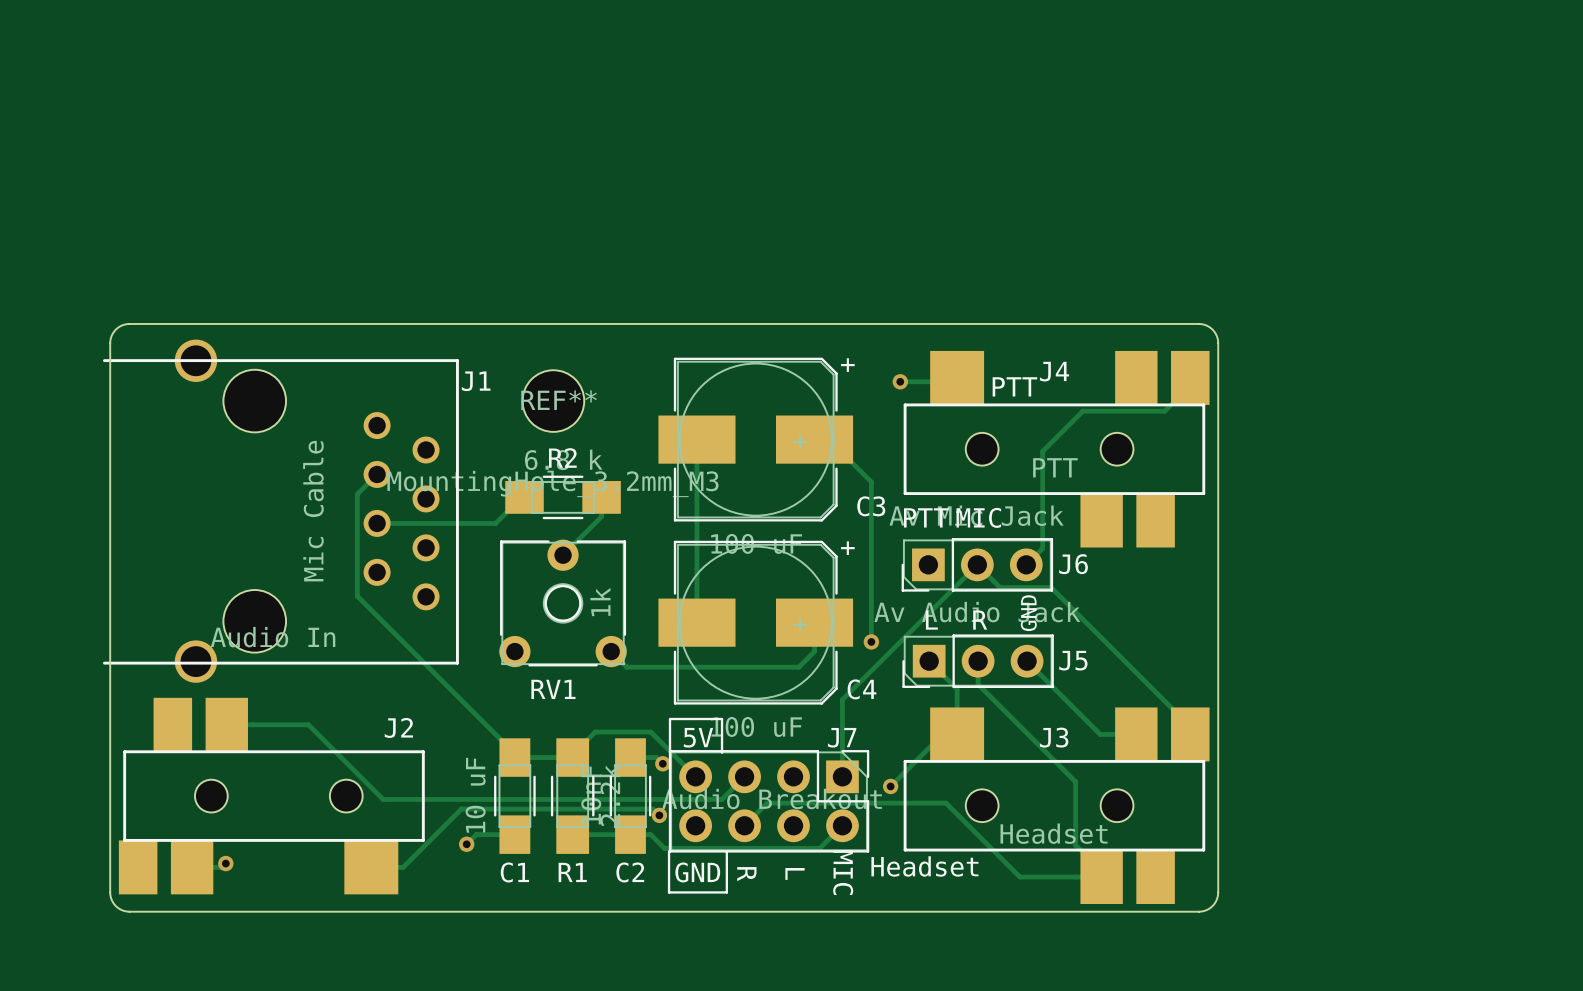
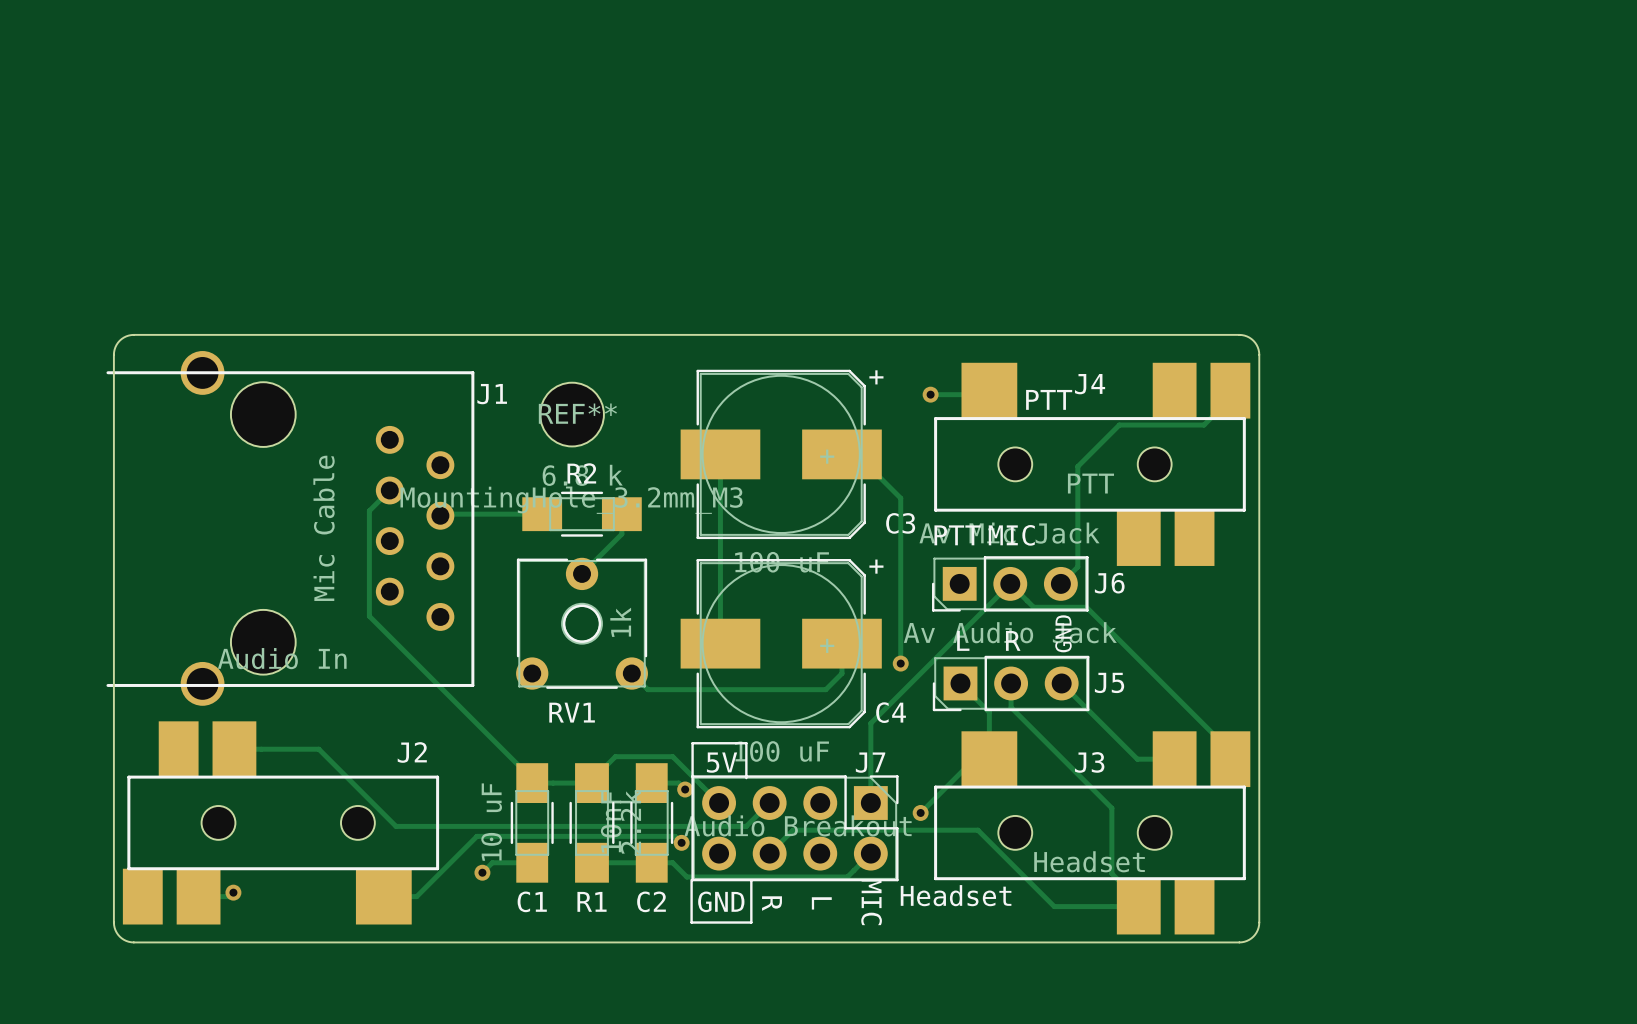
track: (521, 497) (495, 523) (377, 523) -> (539, 514) (441, 514)

